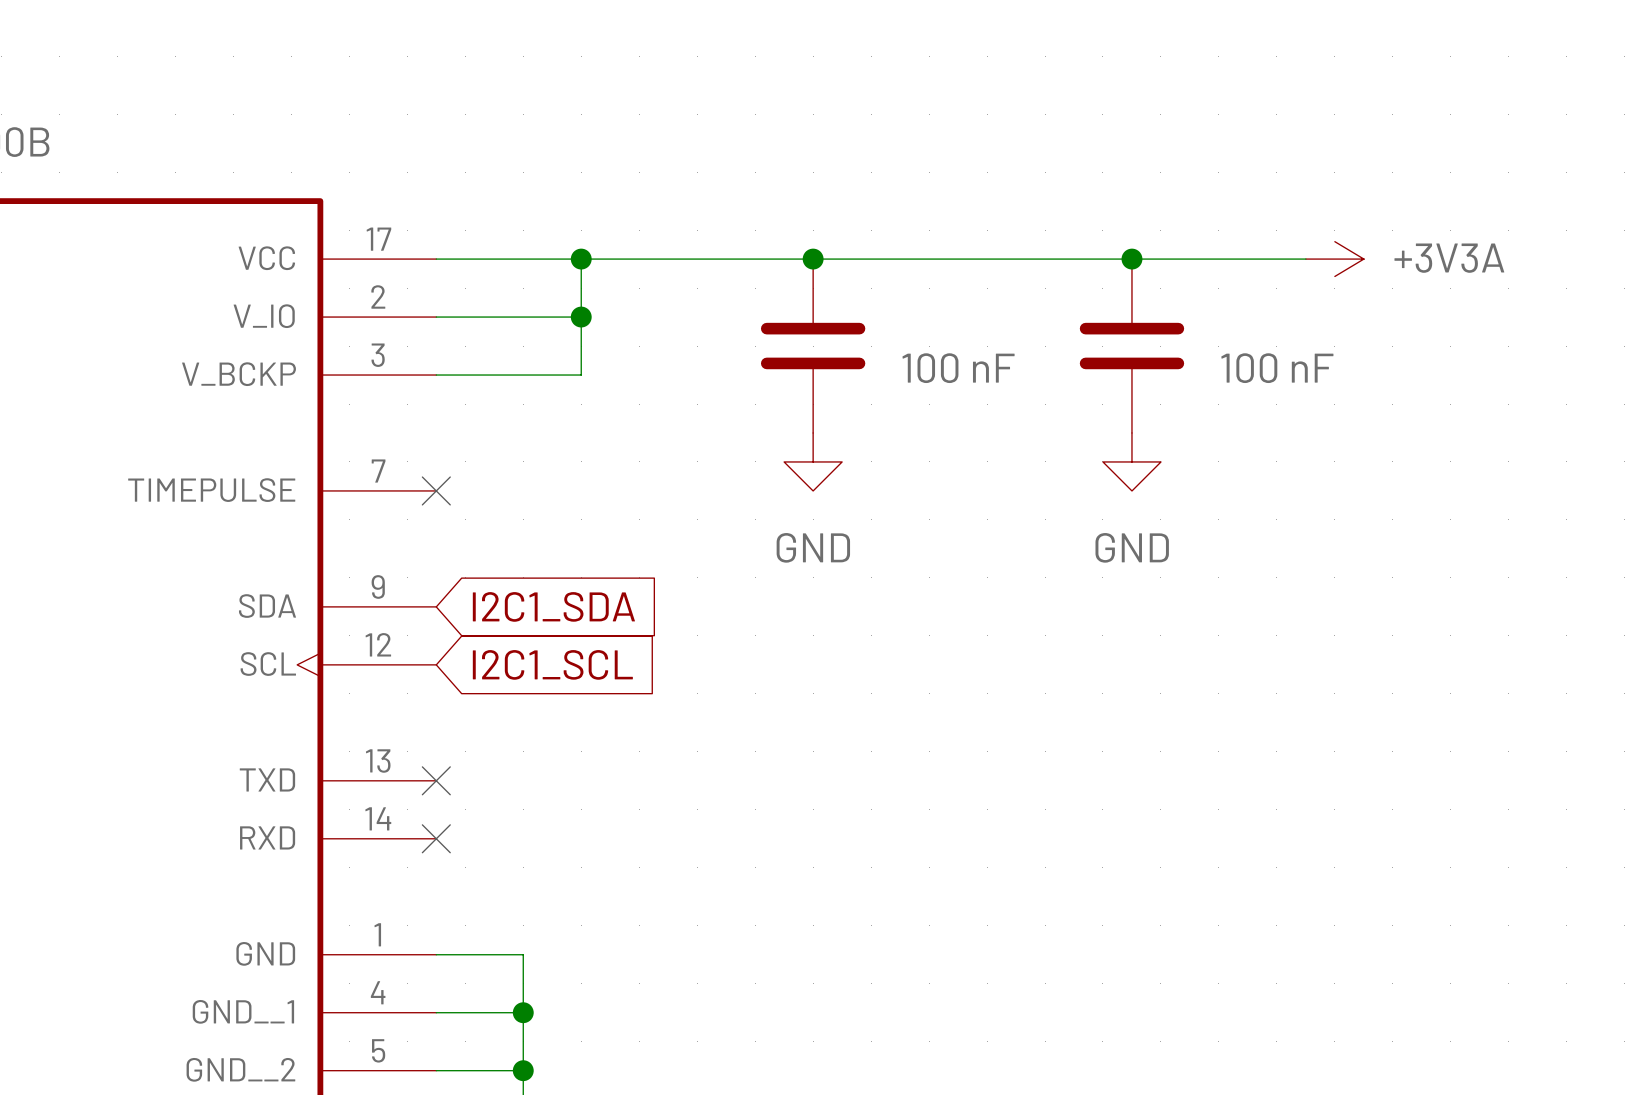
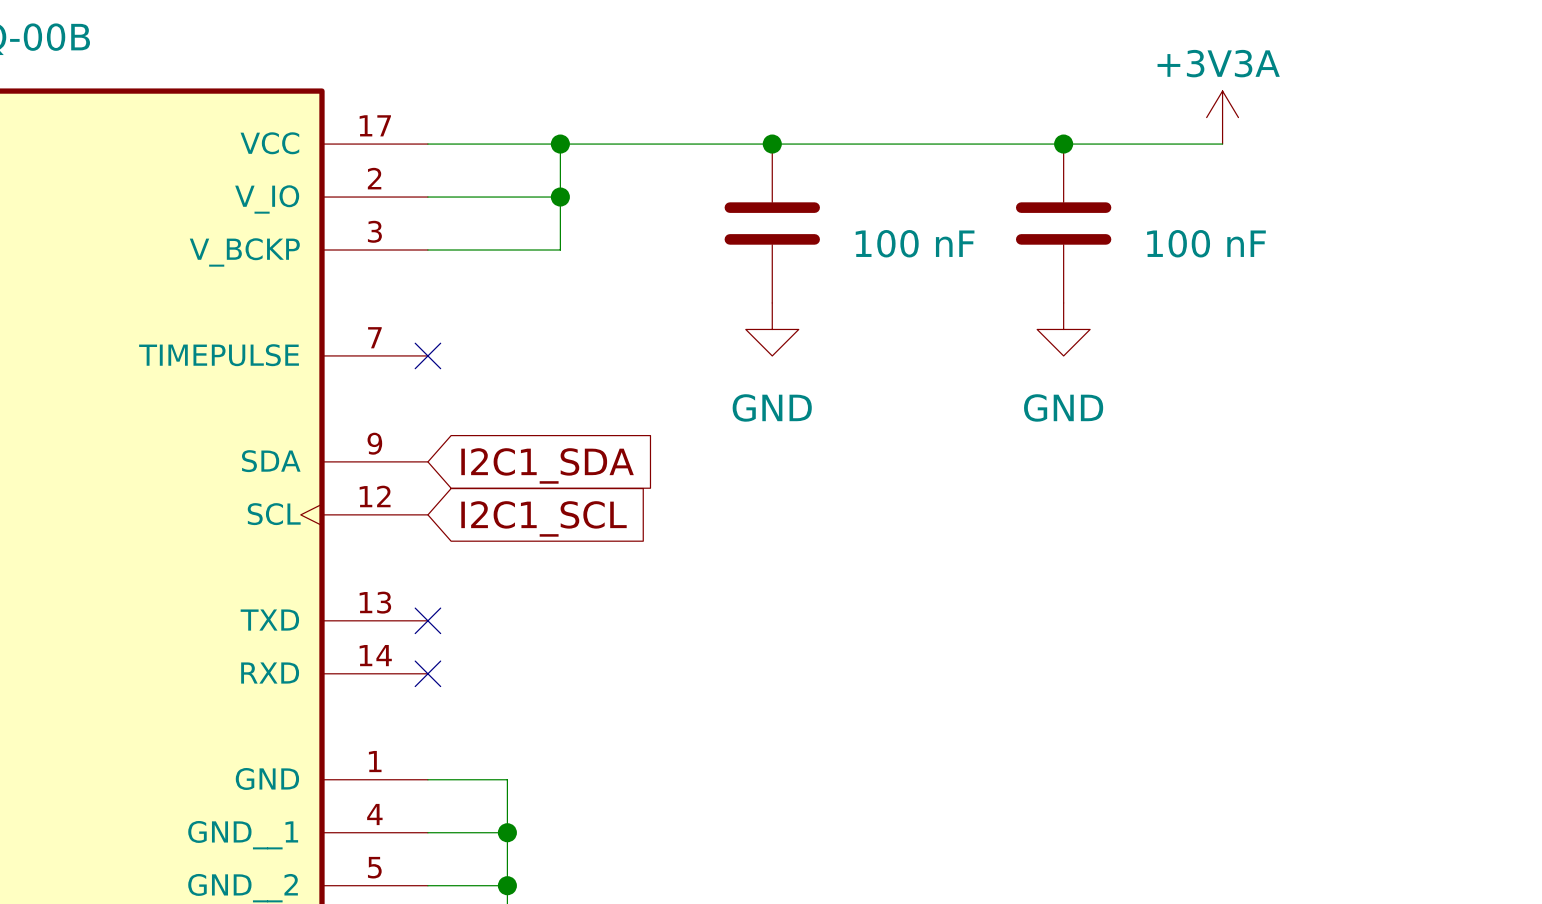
power symbol text position: +3V3A (1449, 258) -> +3V3A (1218, 63)
power symbol rotation: 0° (1334, 259) -> 90° counterclockwise (1222, 117)
power symbol position: +3V3A (1334, 259) -> +3V3A (1222, 117)

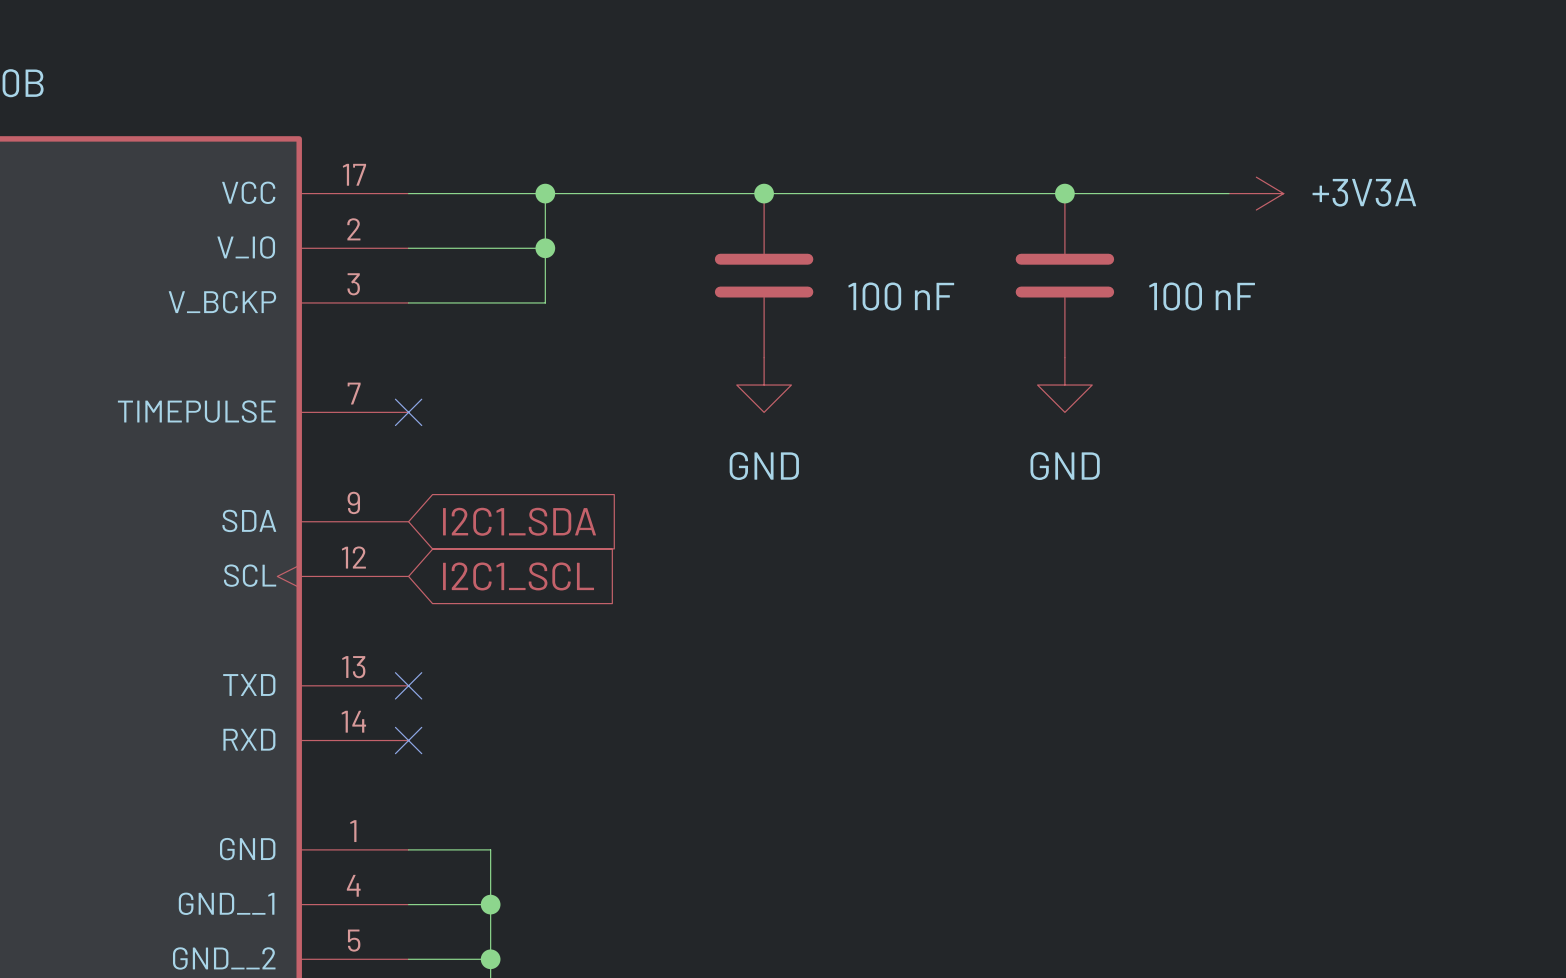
power symbol text position: +3V3A (1218, 63) -> +3V3A (1364, 192)
power symbol rotation: 0° (1222, 117) -> 90° clockwise (1256, 193)
power symbol position: +3V3A (1222, 117) -> +3V3A (1256, 193)

